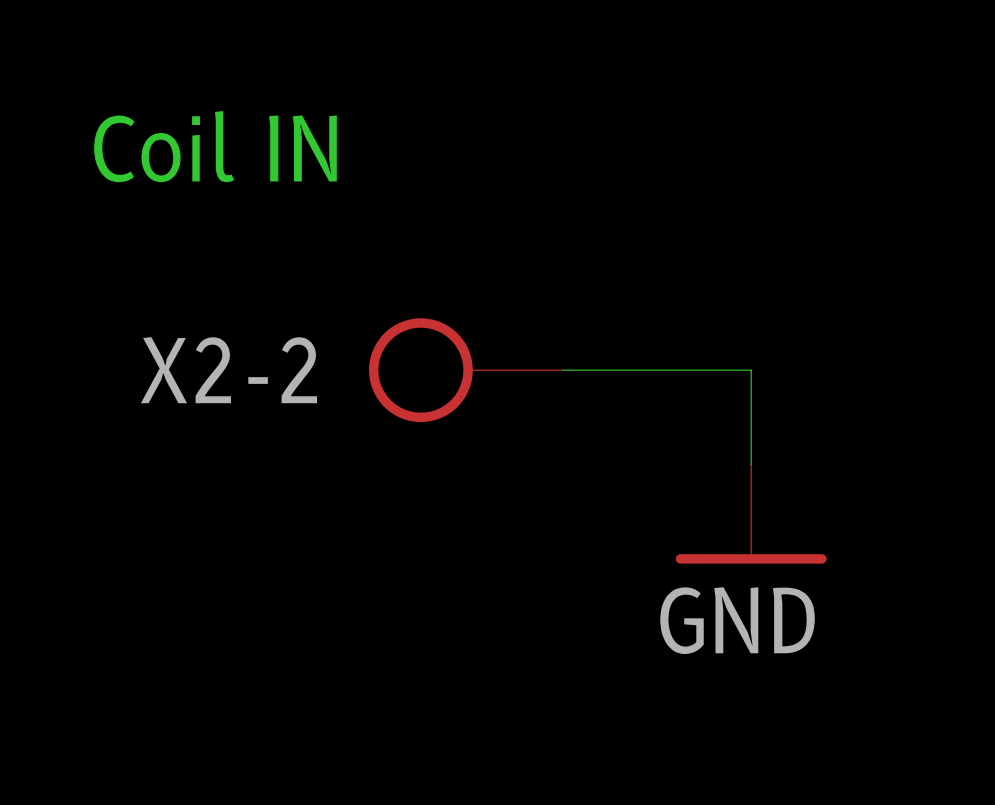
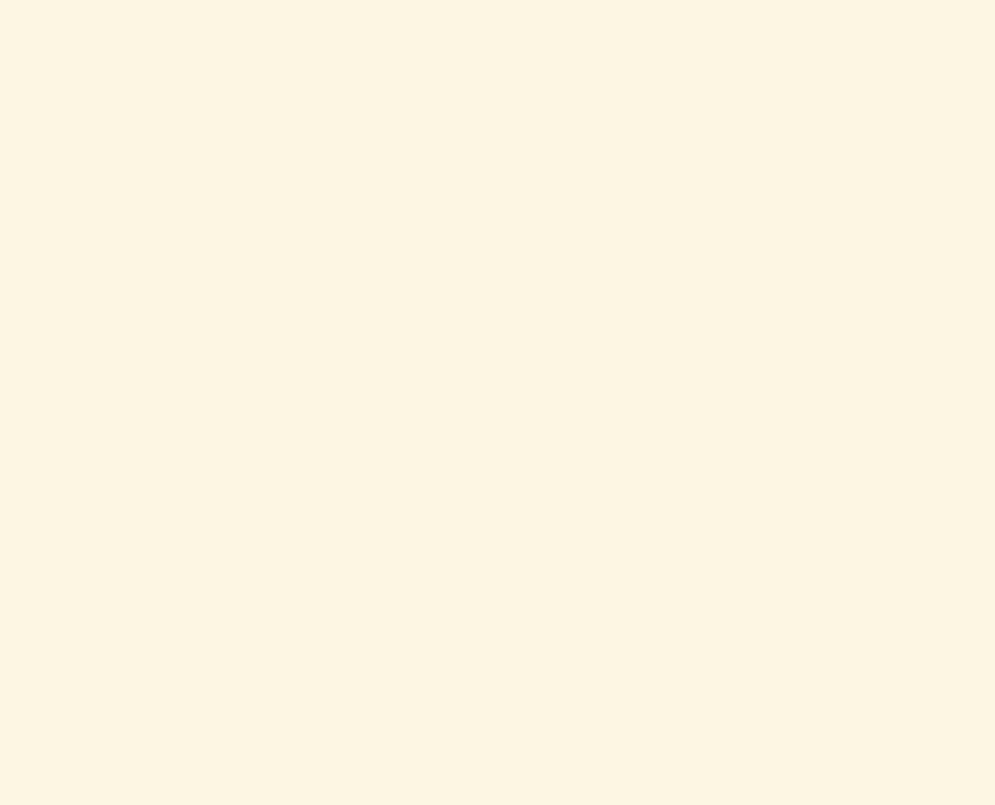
text: Coil IN (215, 146) -> none
X2-2: (465, 370) -> none
wire: (562, 370) (751, 370) (751, 464) -> none
power symbol: GND (751, 514) -> none

